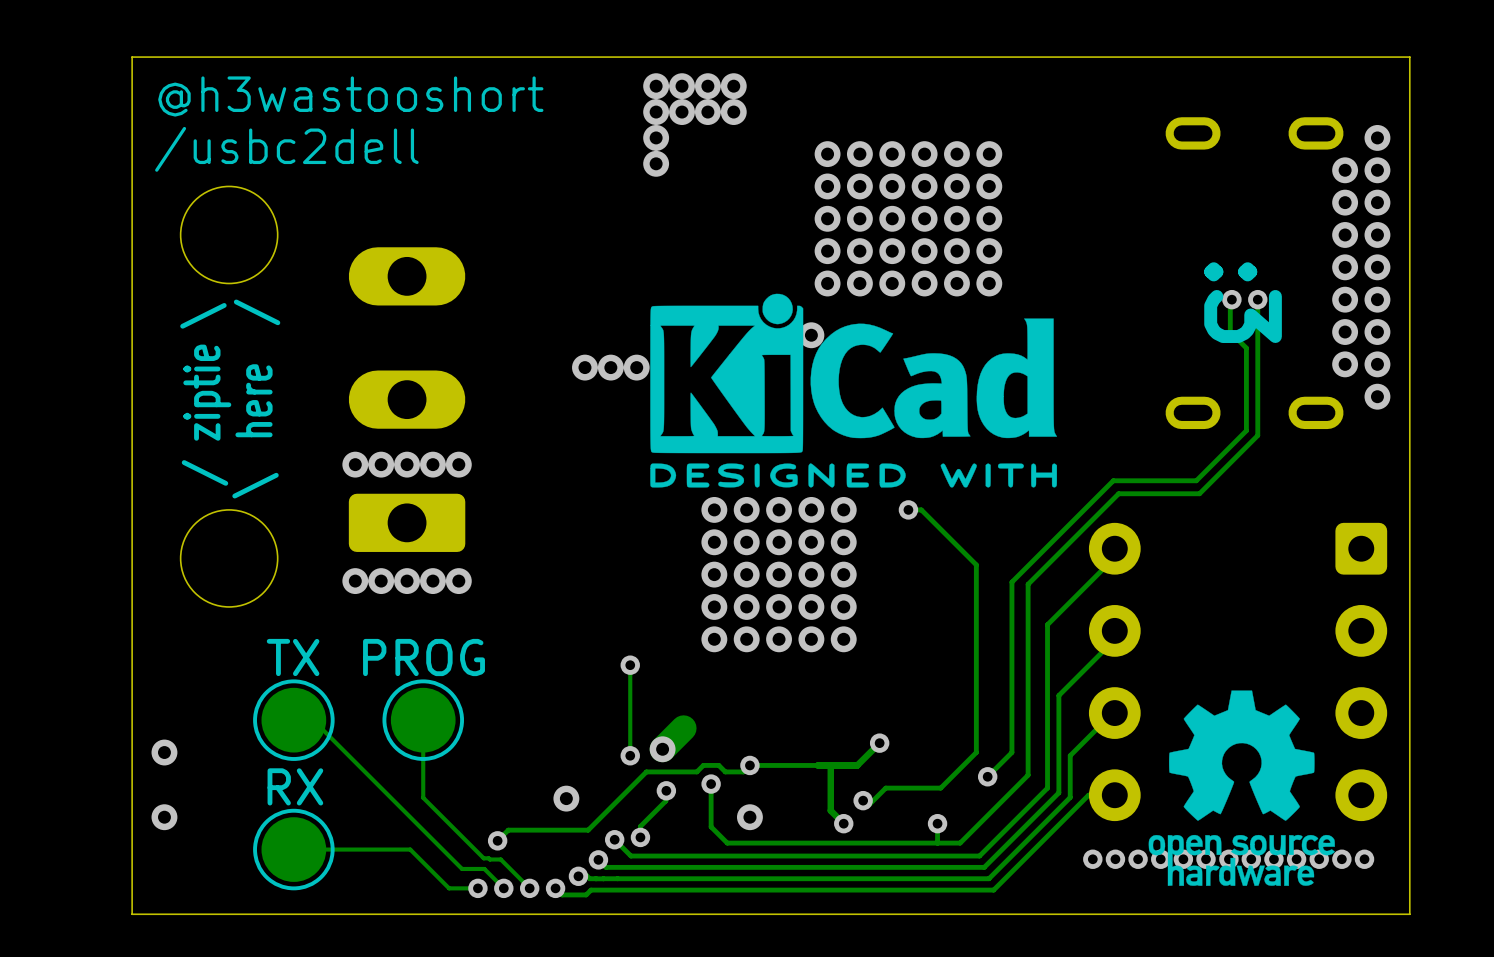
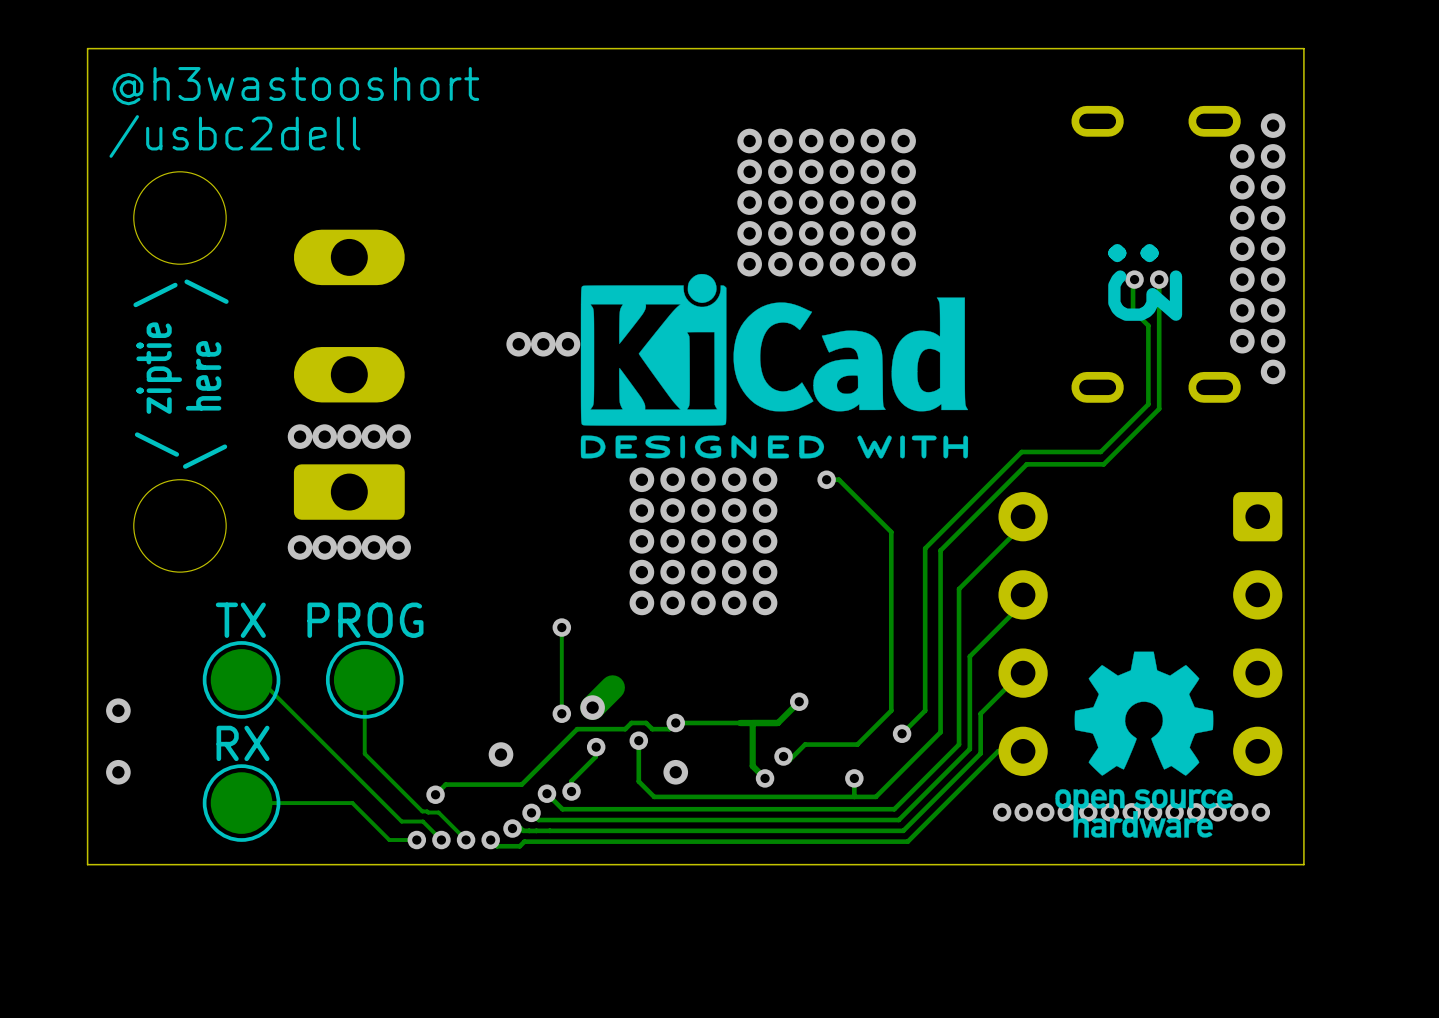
via: (656, 86) -> none
via: (682, 86) -> none
via: (707, 86) -> none
via: (733, 86) -> none
via: (656, 112) -> none
via: (682, 112) -> none
via: (707, 112) -> none
via: (733, 112) -> none
via: (656, 137) -> none
via: (656, 163) -> none
via: (811, 335) -> none

